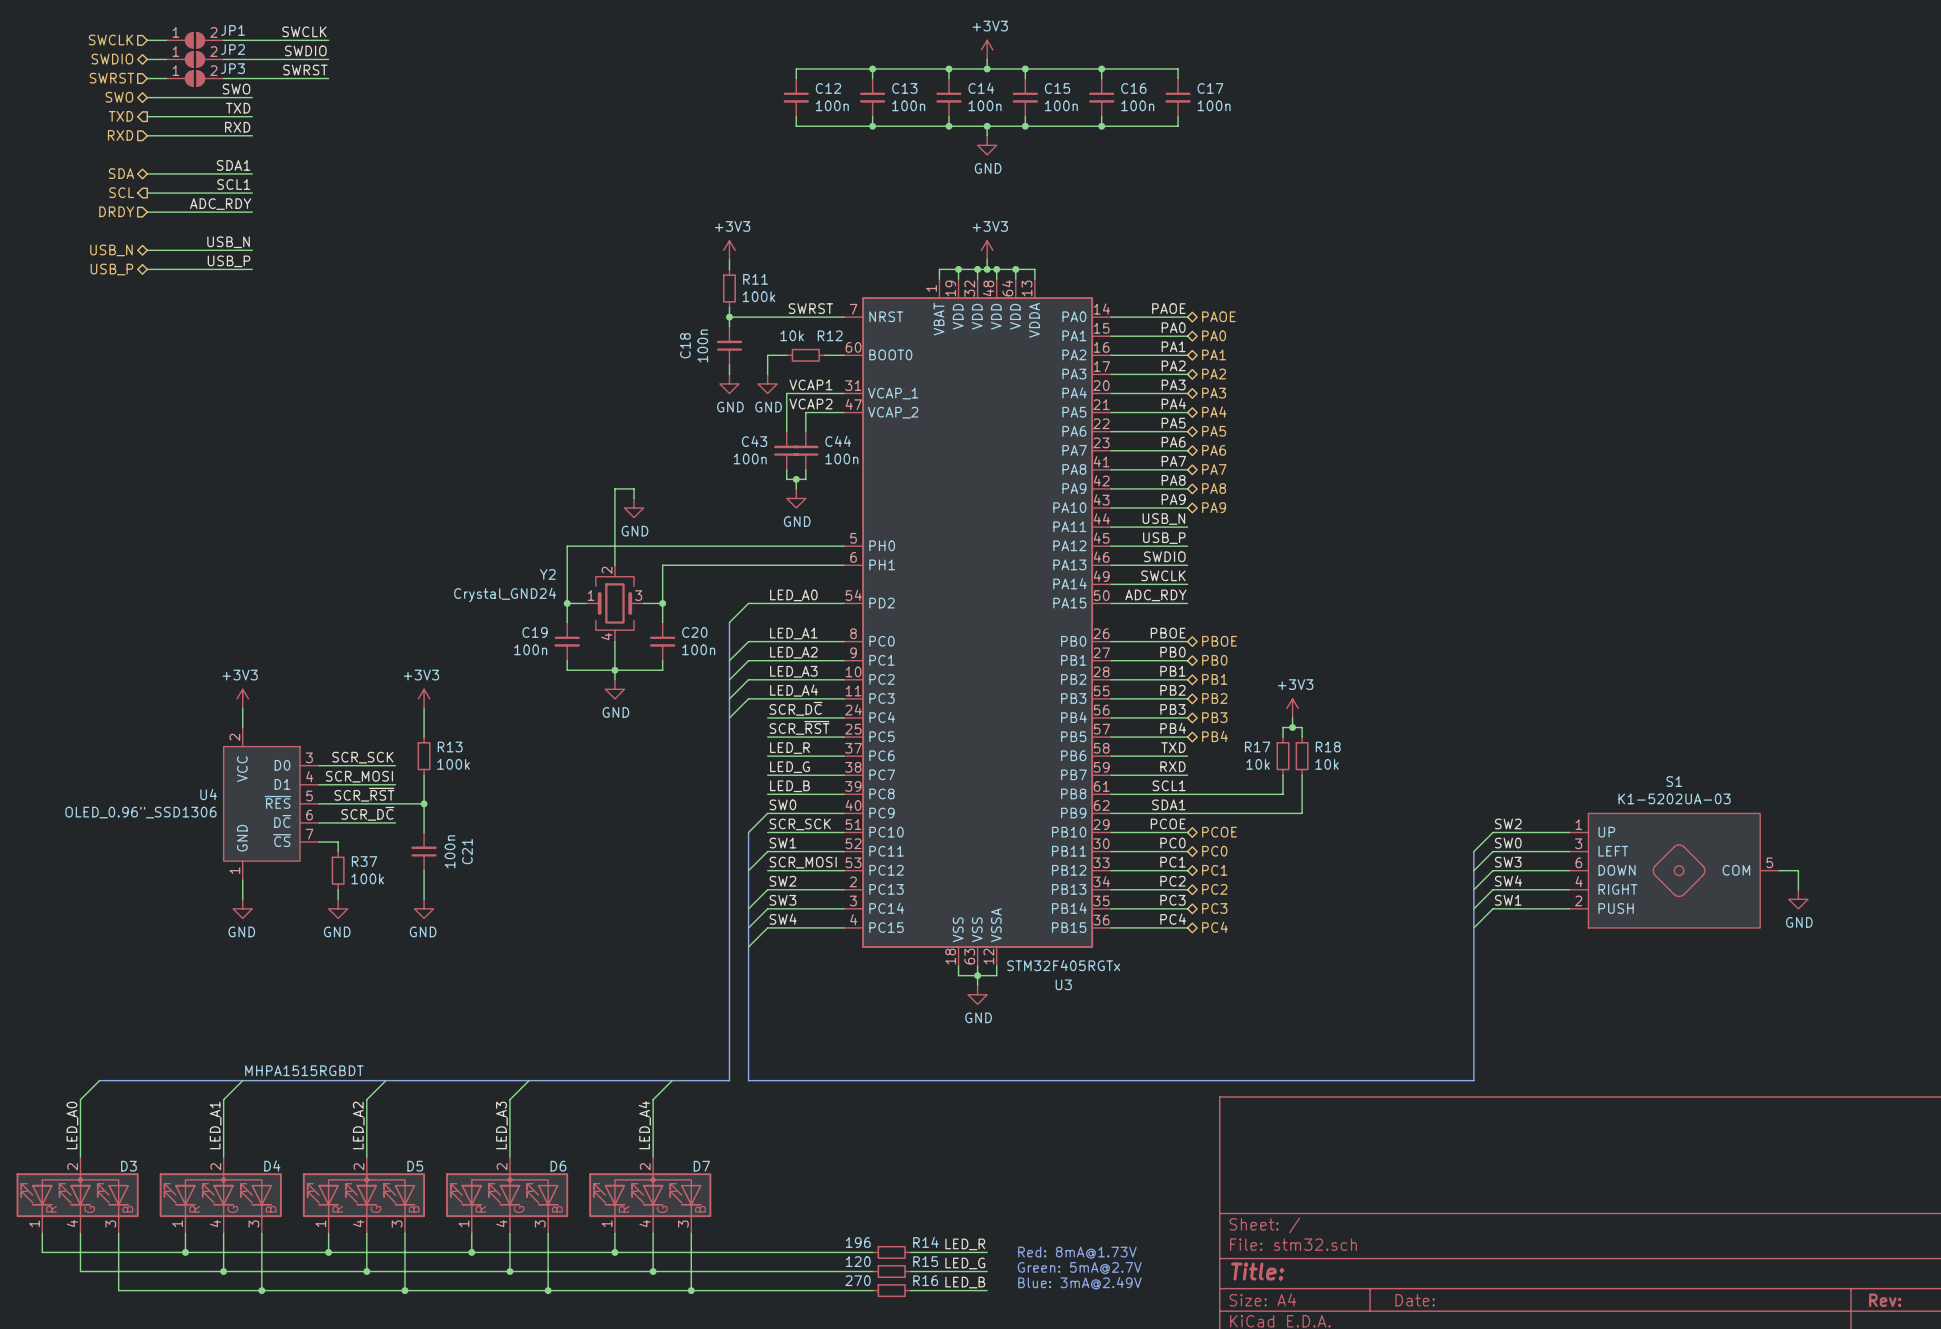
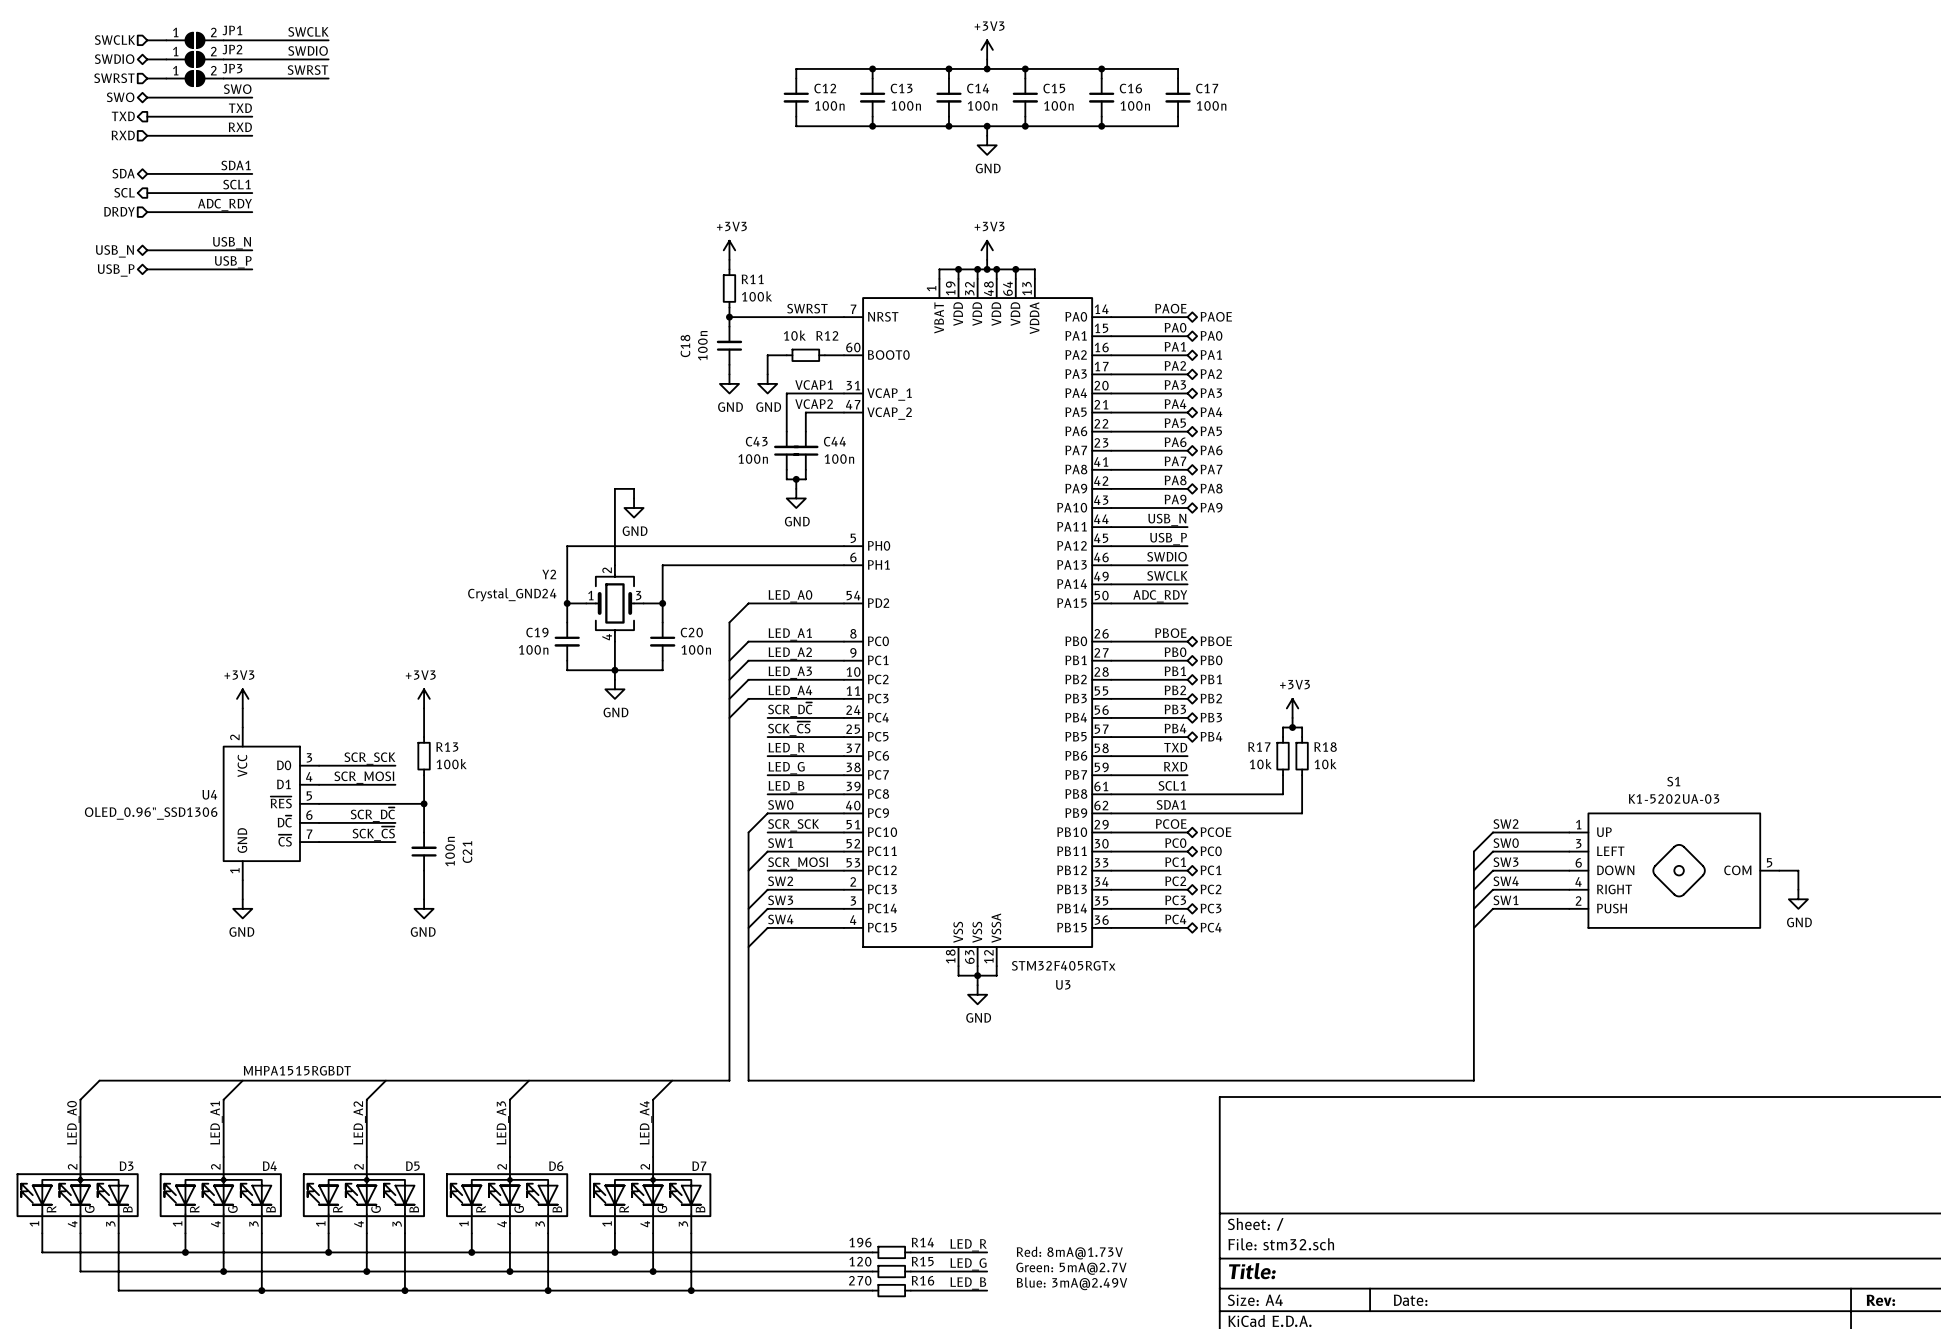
label: SCR_~{RST} (799, 727) -> SCK_~{CS} (789, 728)
label: SCR_~{RST} (364, 794) -> none
label: none -> SCK_~{CS} (373, 833)
wire: (338, 842) (338, 851) -> (338, 842) (395, 842)
R37: 100k (338, 870) -> none
wire: (338, 889) (338, 899) -> none
power symbol: GND (338, 908) -> none

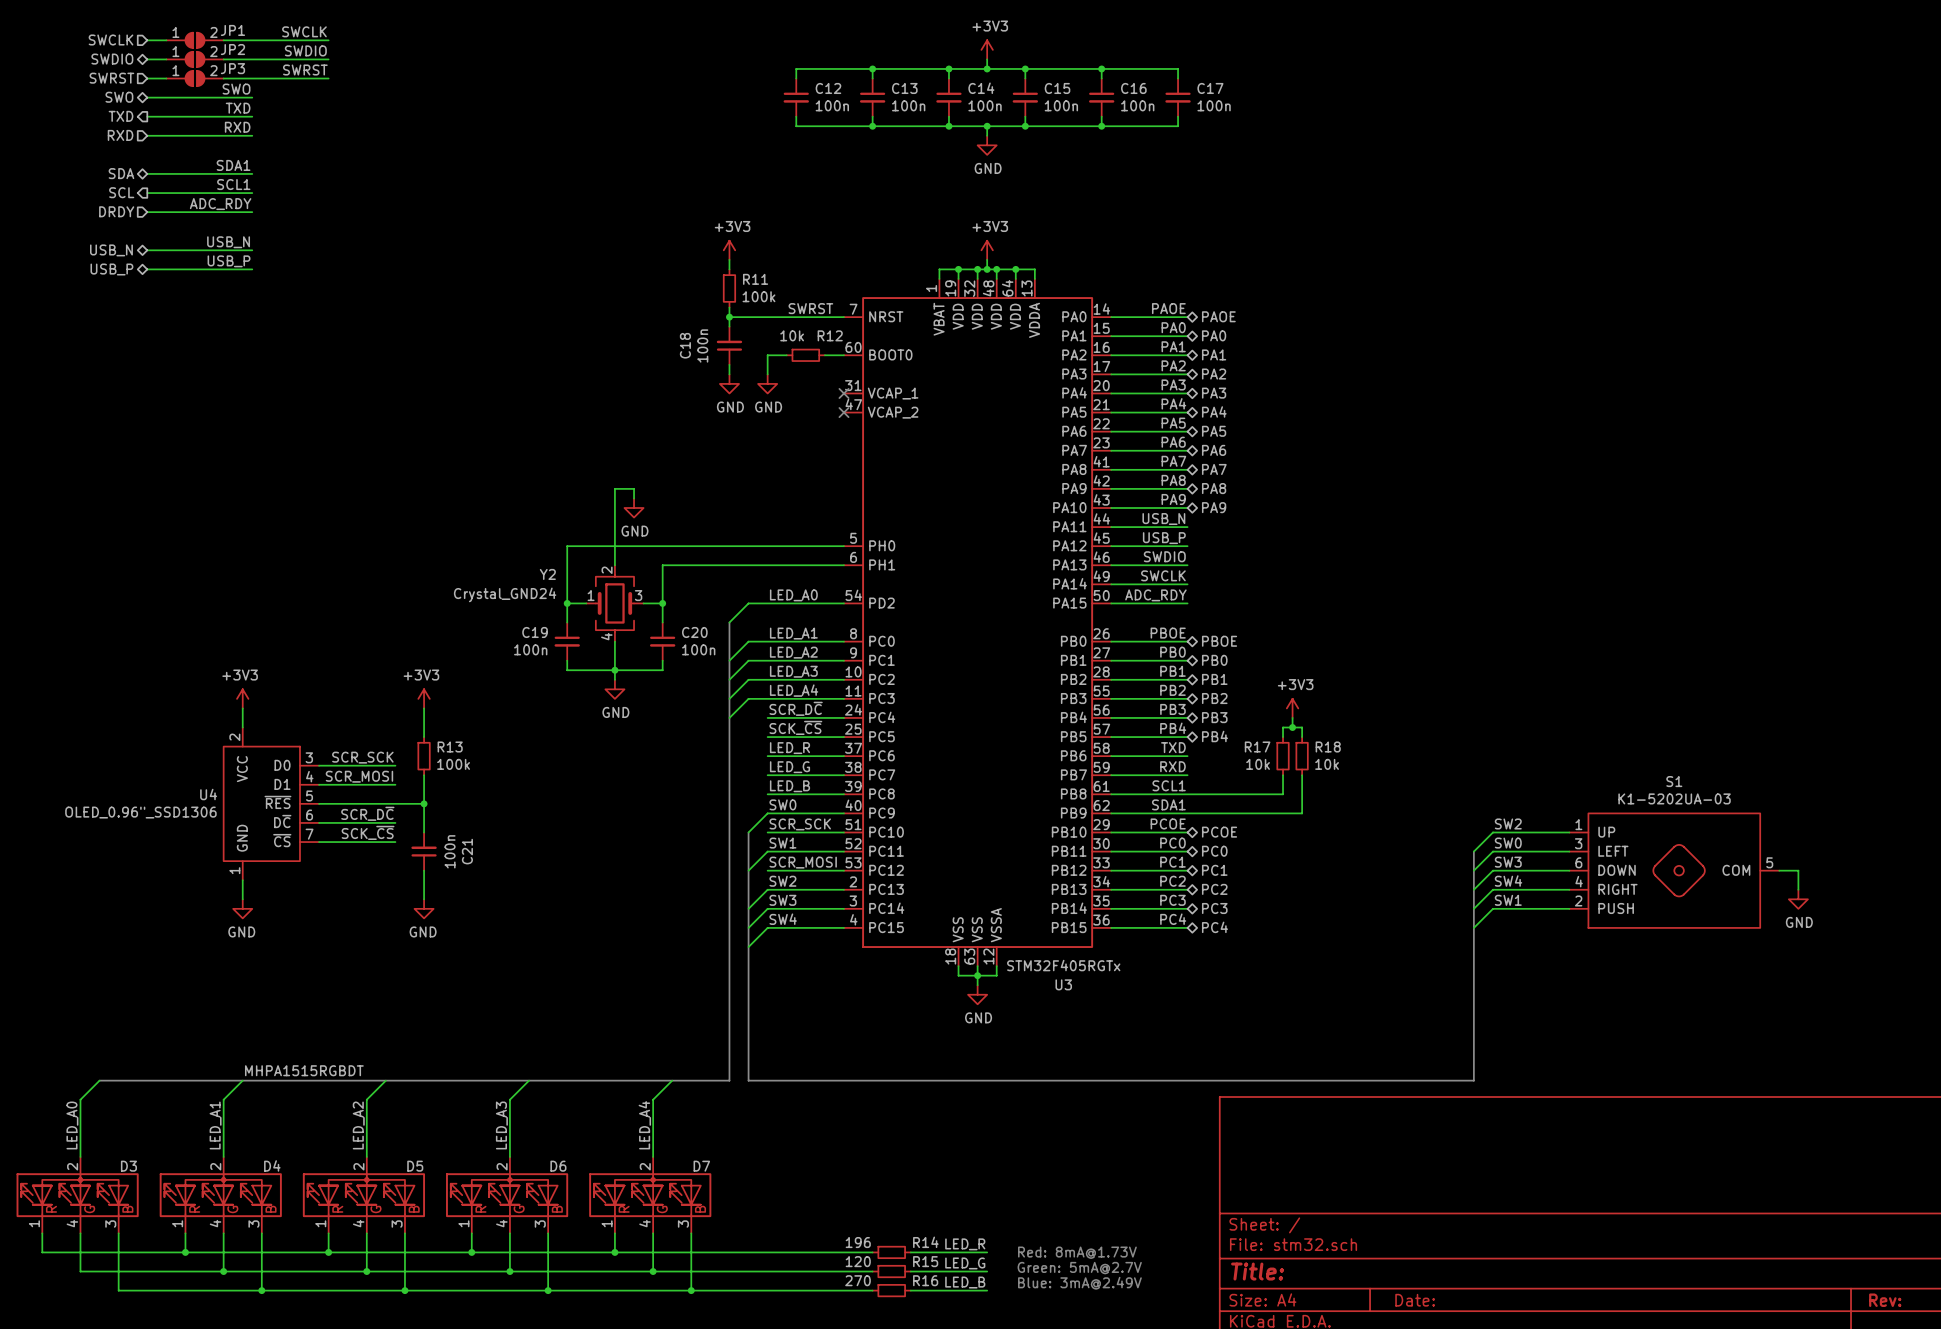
label: VCAP1 (814, 385) -> none
wire: (843, 393) (786, 393) (786, 431) -> none
no-connect mark: none -> (843, 393)
label: VCAP2 (814, 404) -> none
wire: (843, 412) (805, 412) (805, 431) -> none
no-connect mark: none -> (843, 412)
C43: 100n (786, 450) -> none
C44: 100n (805, 450) -> none
wire: (786, 469) (786, 479) (805, 479) (805, 469) -> none
wire: (796, 479) (796, 488) -> none
junction: (796, 479) -> none
power symbol: GND (796, 498) -> none

